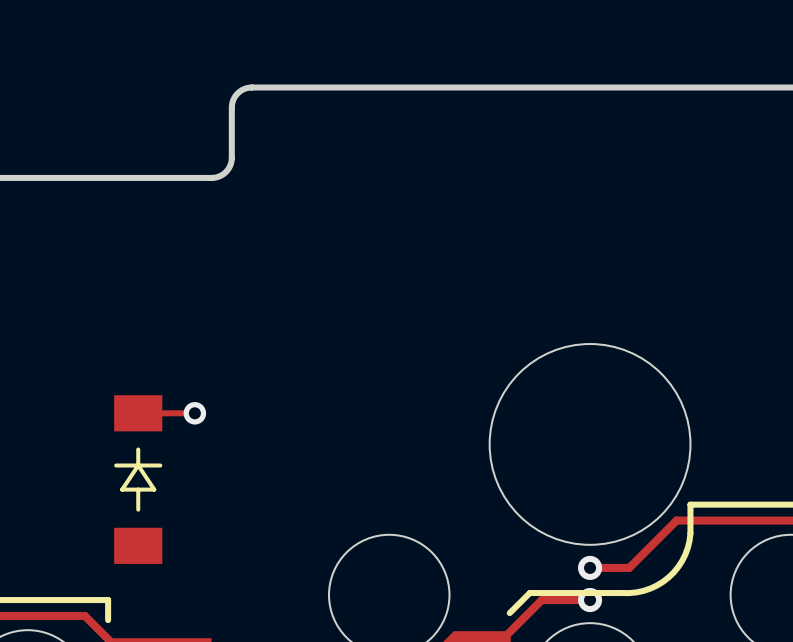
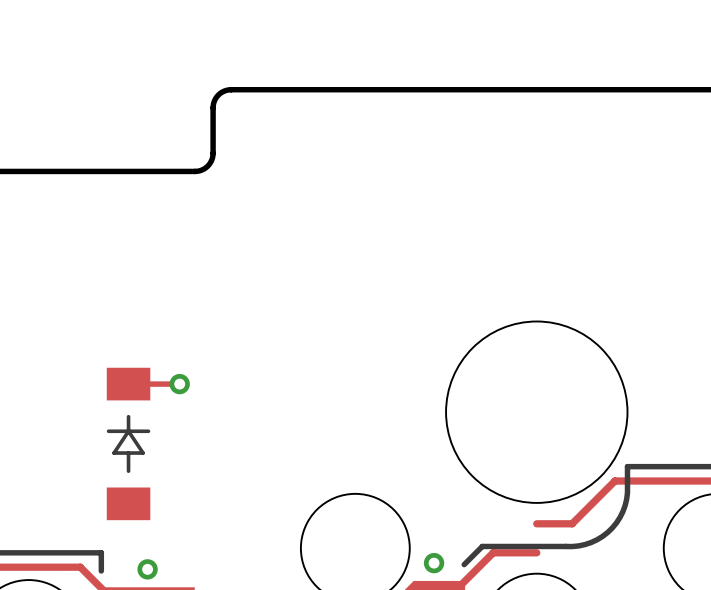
via: (590, 567) -> none
via: (590, 600) -> none
via: none -> (434, 563)
via: none -> (147, 569)

